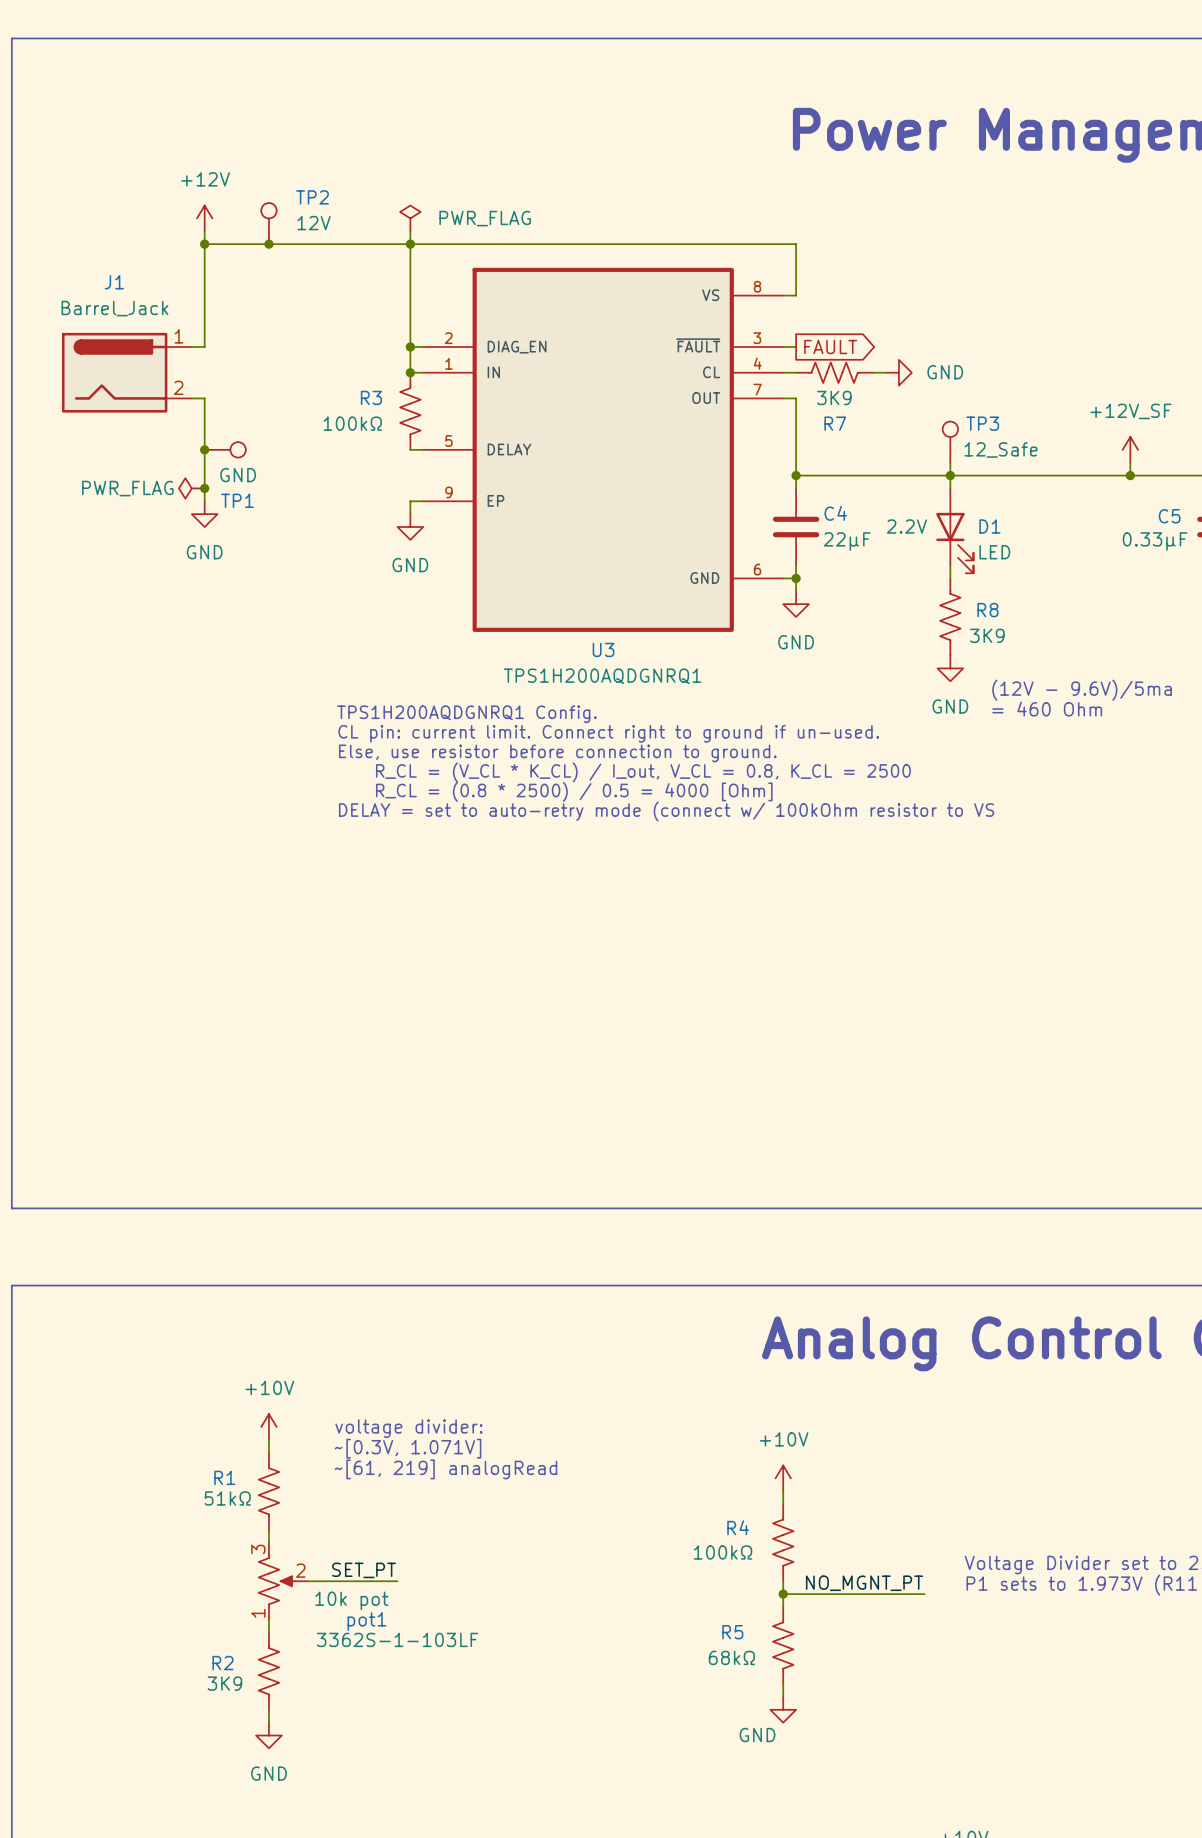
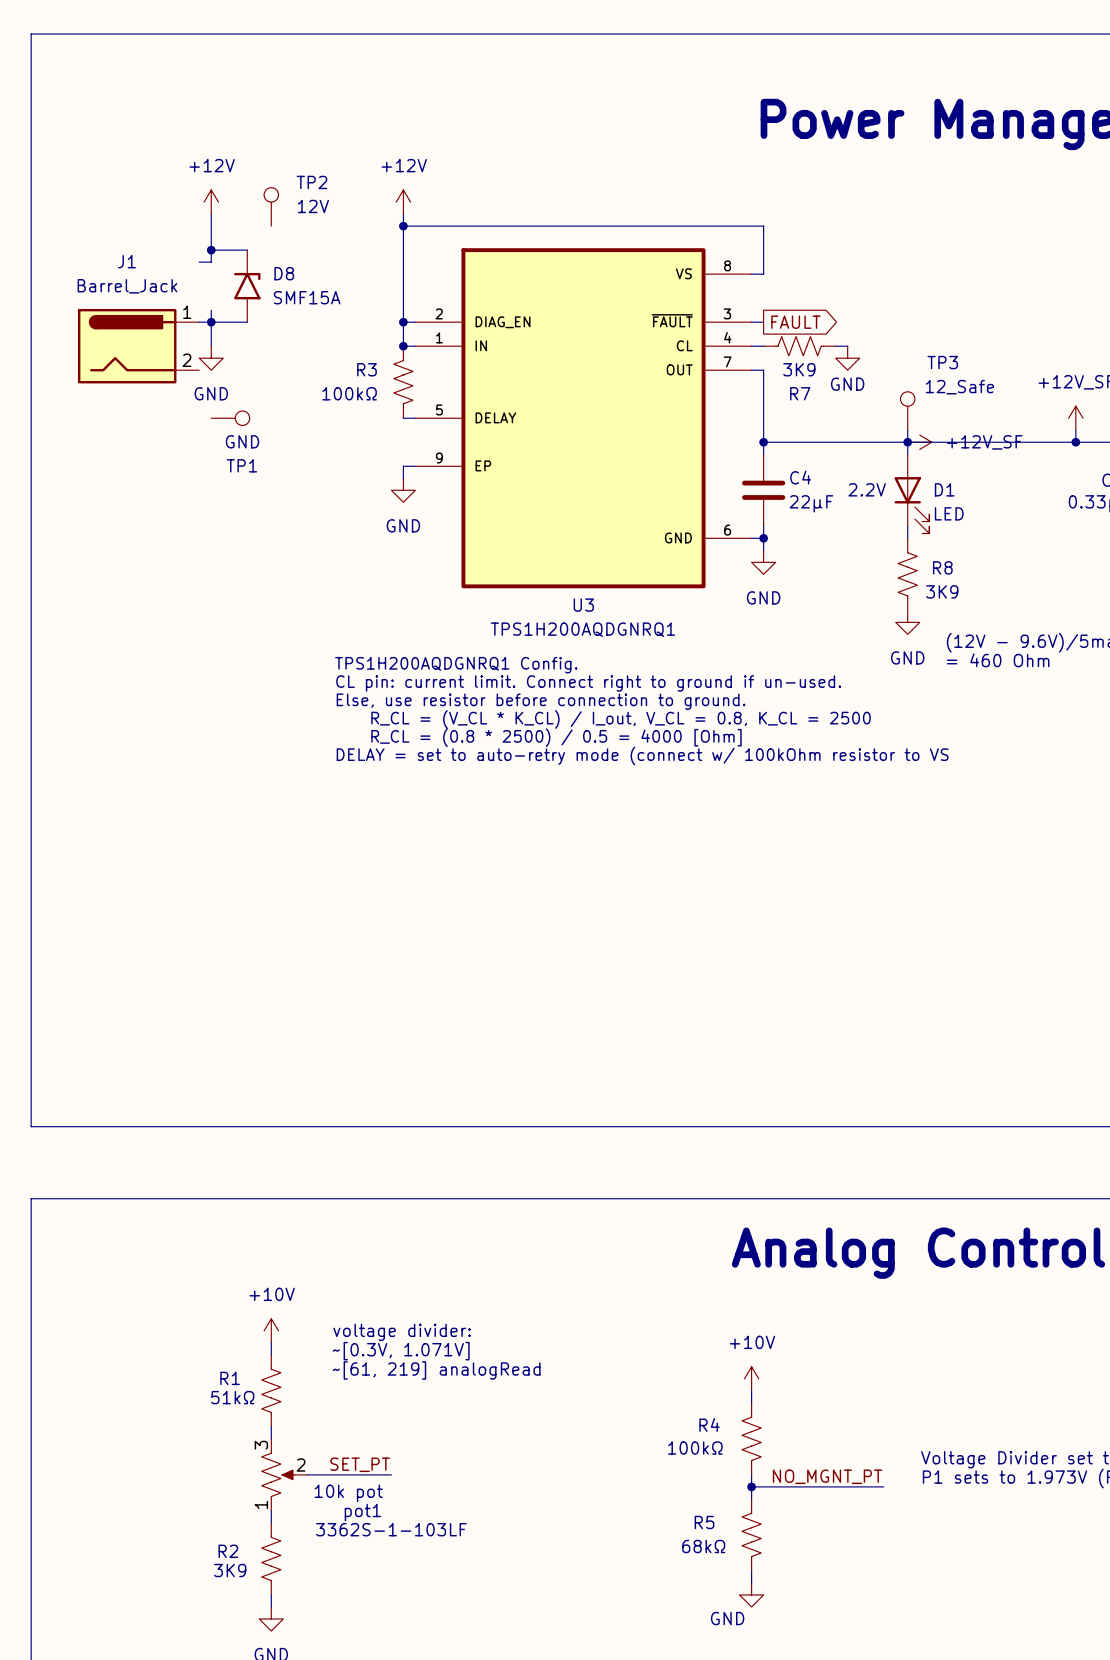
power symbol: PWR_FLAG (410, 218) -> +12V (403, 202)
wire: (204, 244) (410, 244) -> none
junction position: (204, 244) -> (211, 250)
junction: (268, 244) -> none
wire: none -> (211, 250) (247, 250)
wire: (204, 282) (204, 334) -> (211, 262) (199, 262)
D8: none -> SMF15A (247, 286)
junction: none -> (211, 322)
wire: none -> (247, 322) (211, 322) (211, 346)
power symbol rotation: 0° (898, 372) -> 90° clockwise (847, 358)
power symbol position: GND (898, 372) -> GND (847, 358)
power symbol text position: GND (945, 372) -> GND (847, 384)
wire: (191, 398) (204, 398) (204, 501) -> none
TP3 name position: TP3 (982, 423) -> TP3 (942, 362)
junction: (204, 449) -> none
TP3 value position: 12_Safe (1001, 449) -> 12_Safe (959, 387)
power symbol: none -> +12V_SF (919, 442)
power symbol: PWR_FLAG (191, 488) -> none
junction: (204, 488) -> none
power symbol position: GND (204, 514) -> GND (211, 358)

